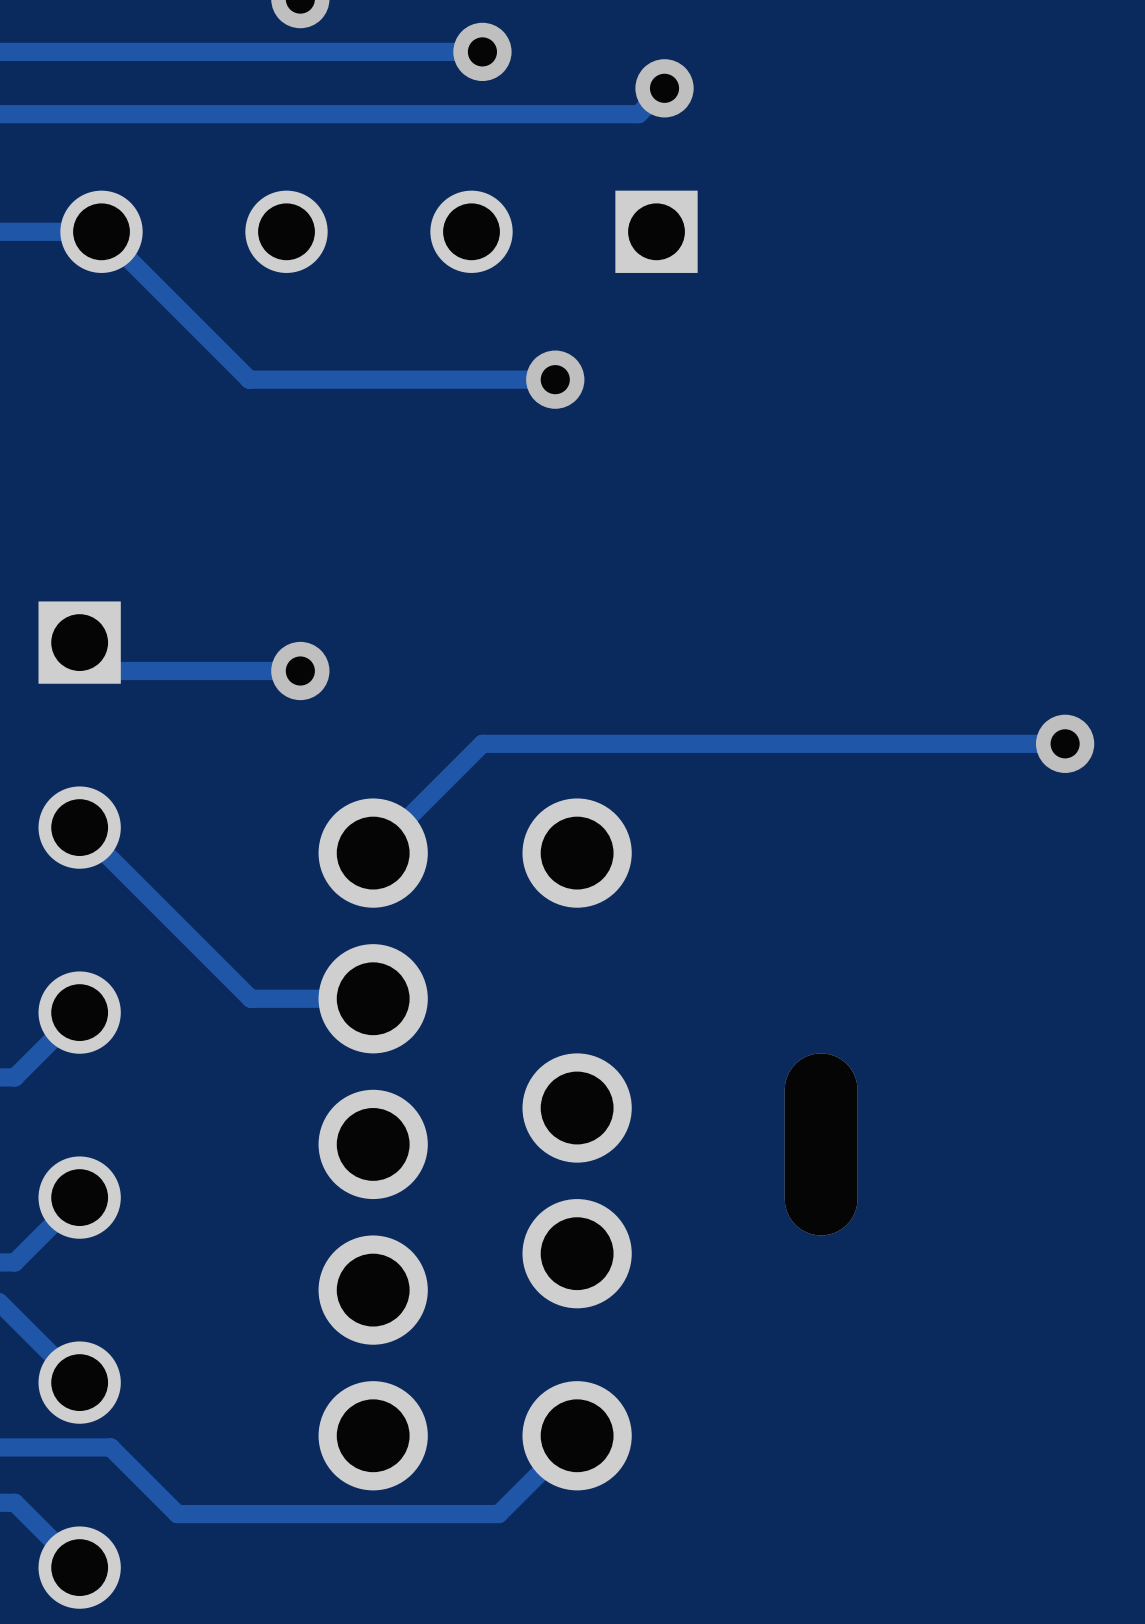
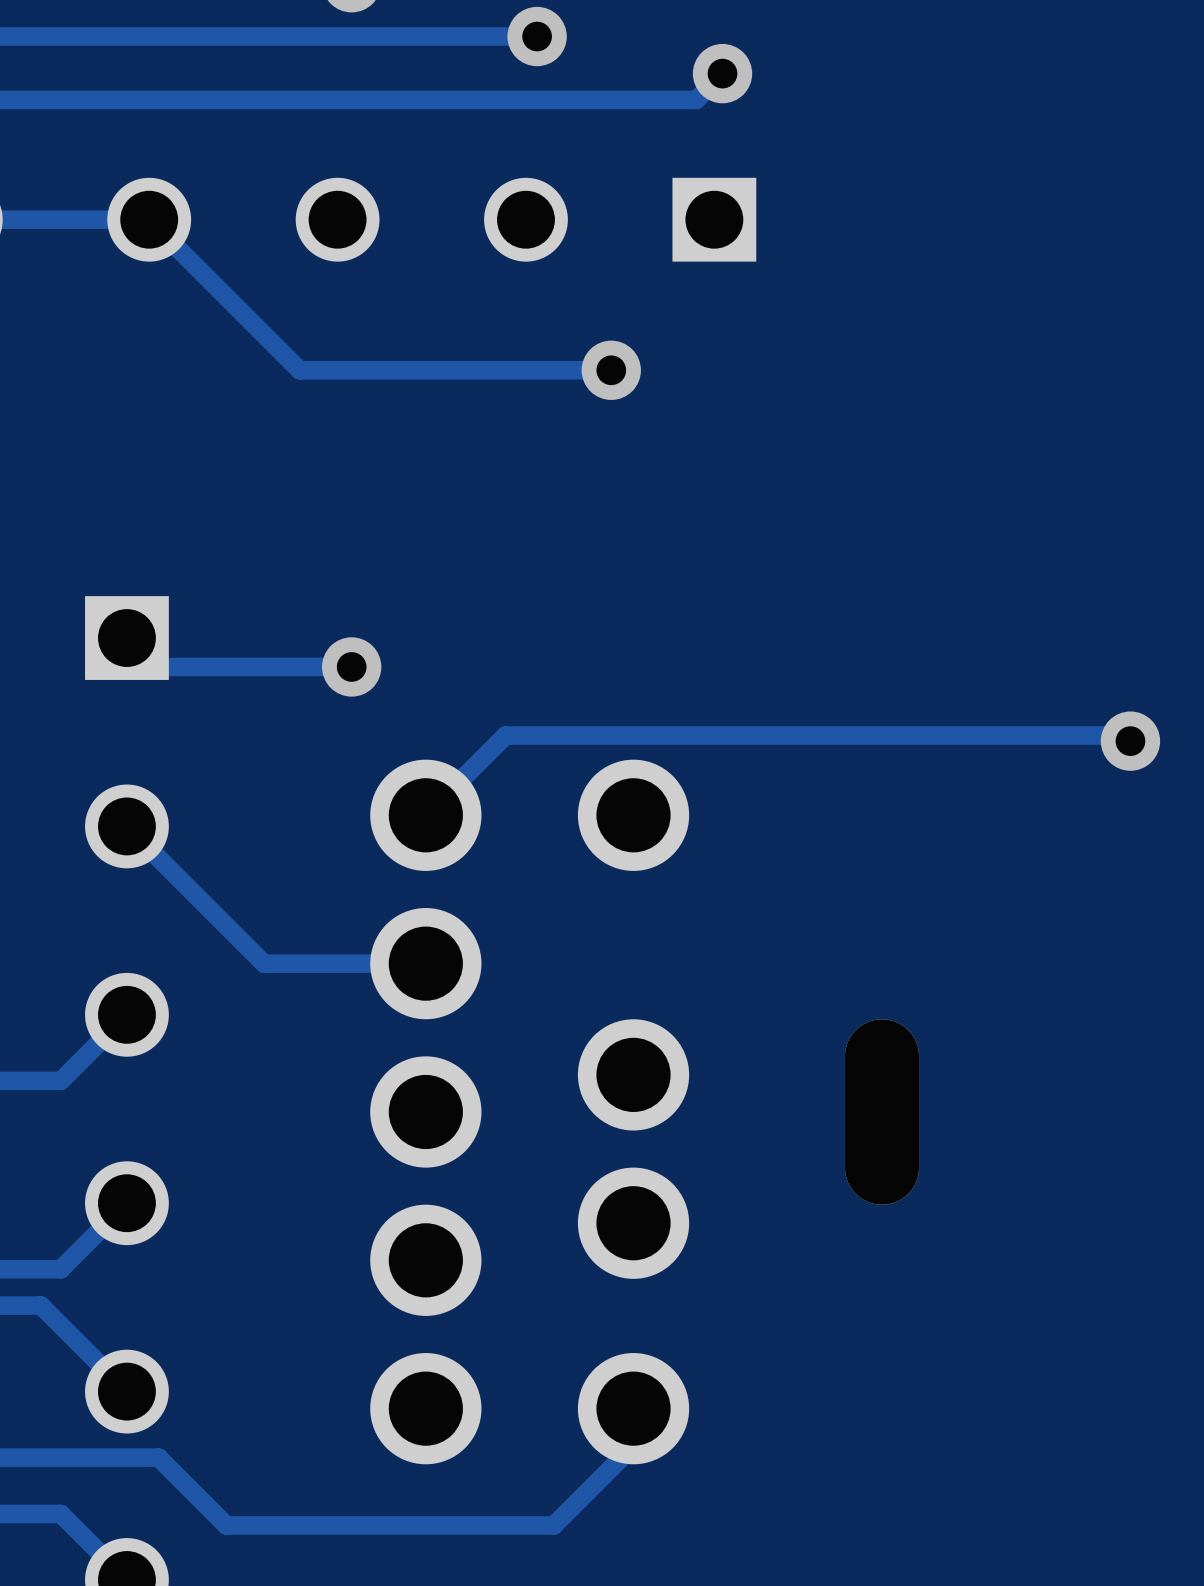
track: (1065, 743) (482, 743) (373, 853) -> (1130, 741) (1124, 735) (505, 735) (425, 815)
track: (214, 962) (250, 998) (373, 998) -> (264, 963) (425, 963)
part position: (588, 1144) -> (644, 1111)

